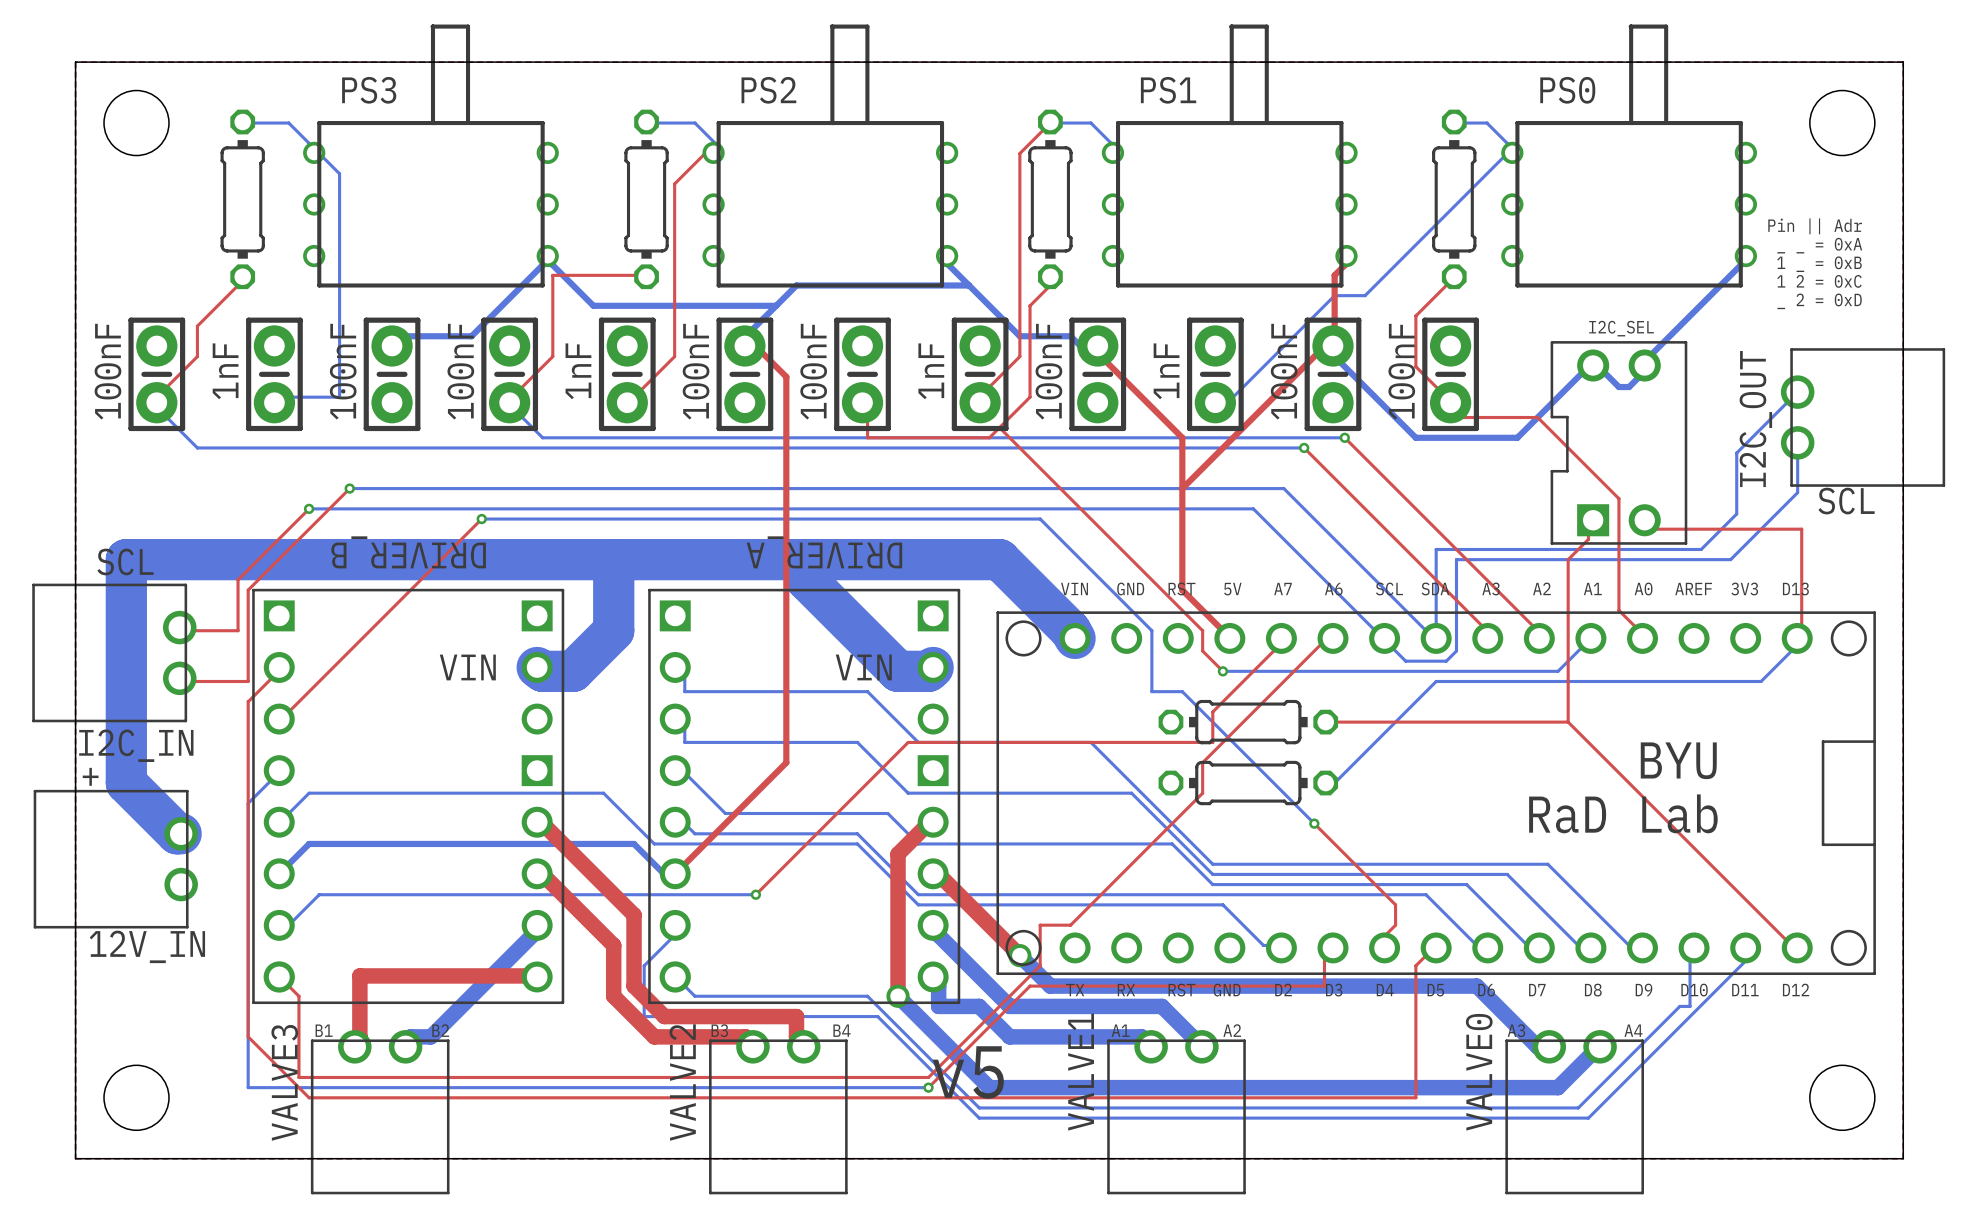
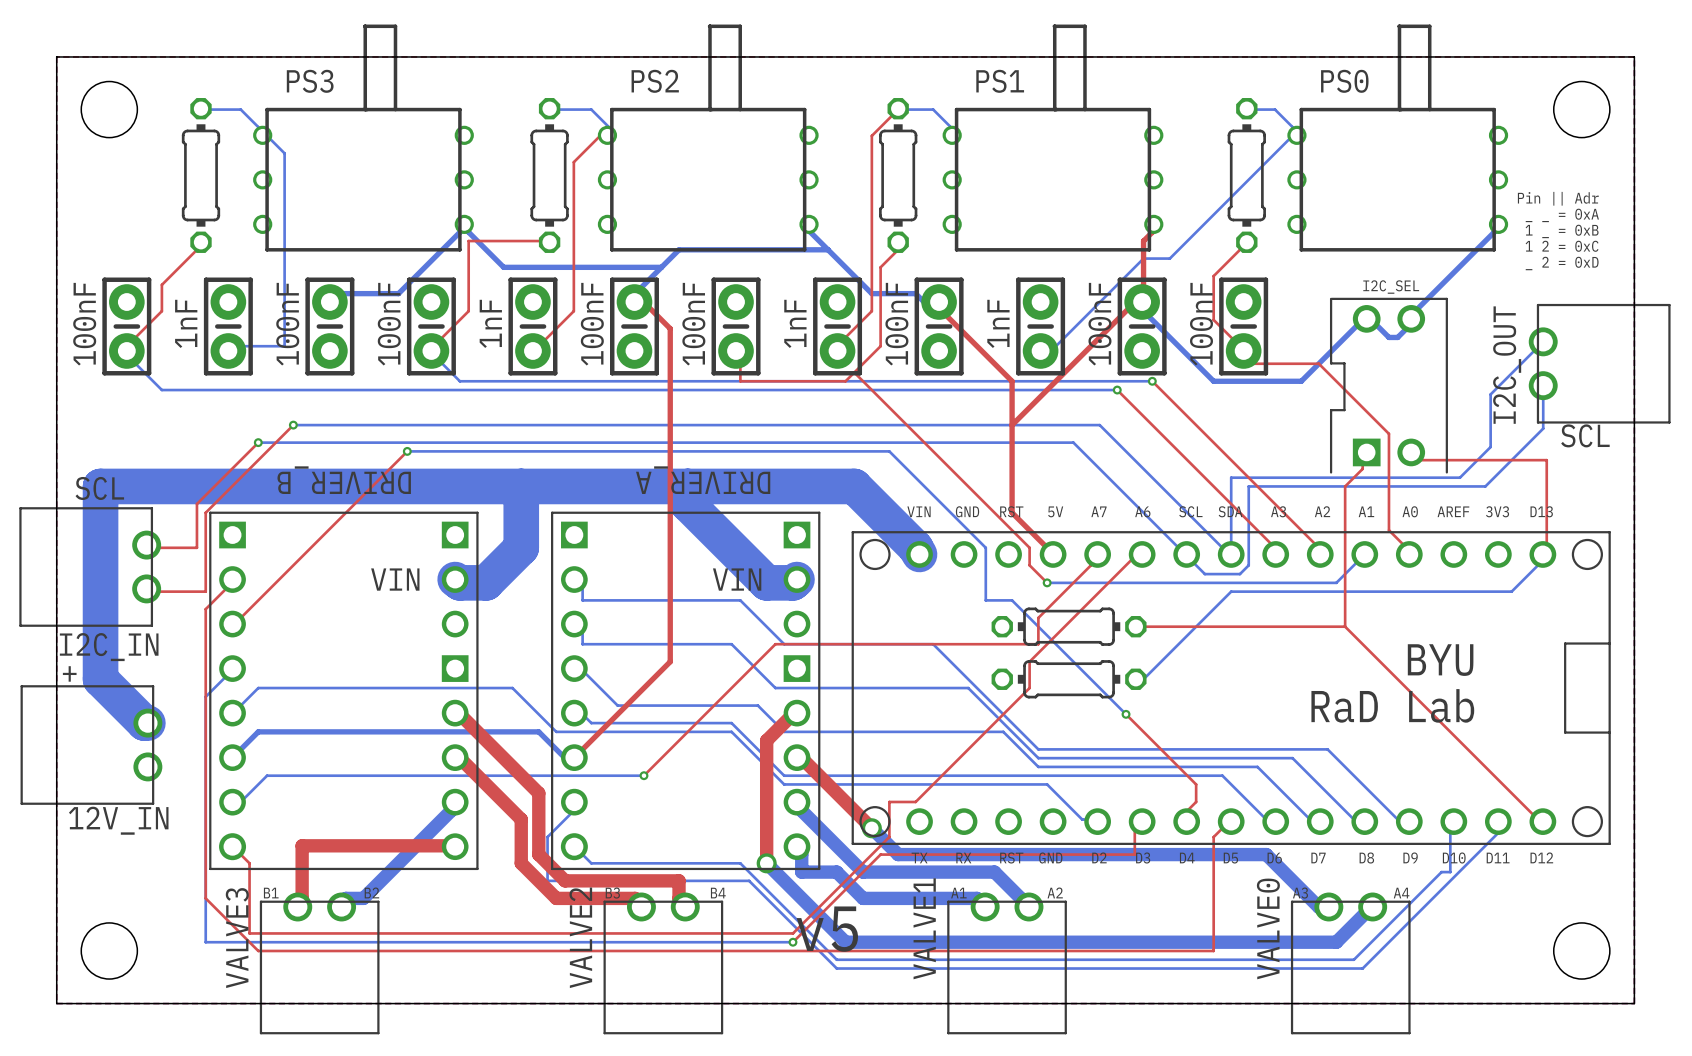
I2C_SEL footprint: [1550, 341, 1688, 545] -> [1329, 297, 1448, 474]

